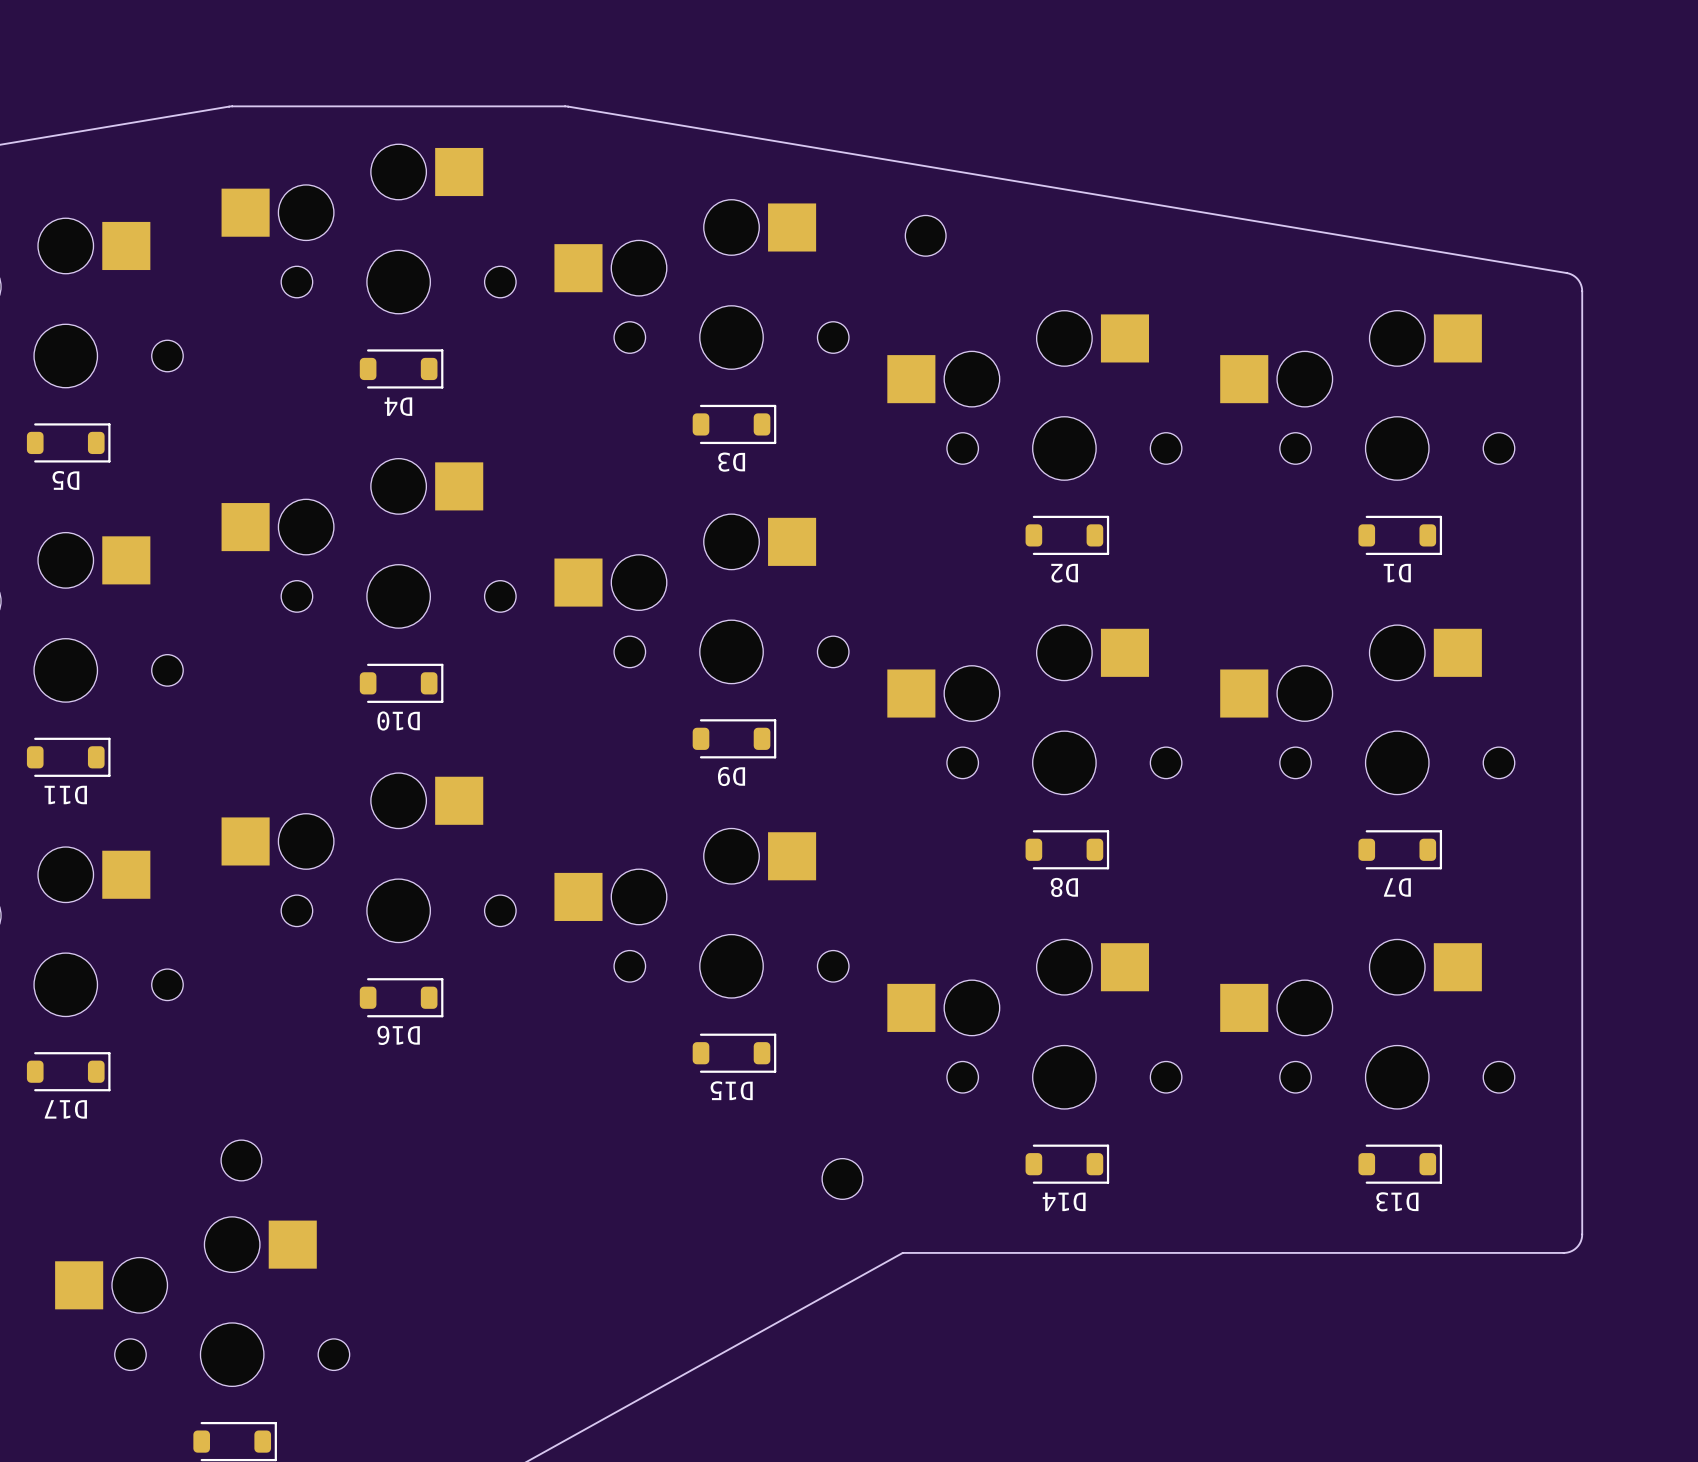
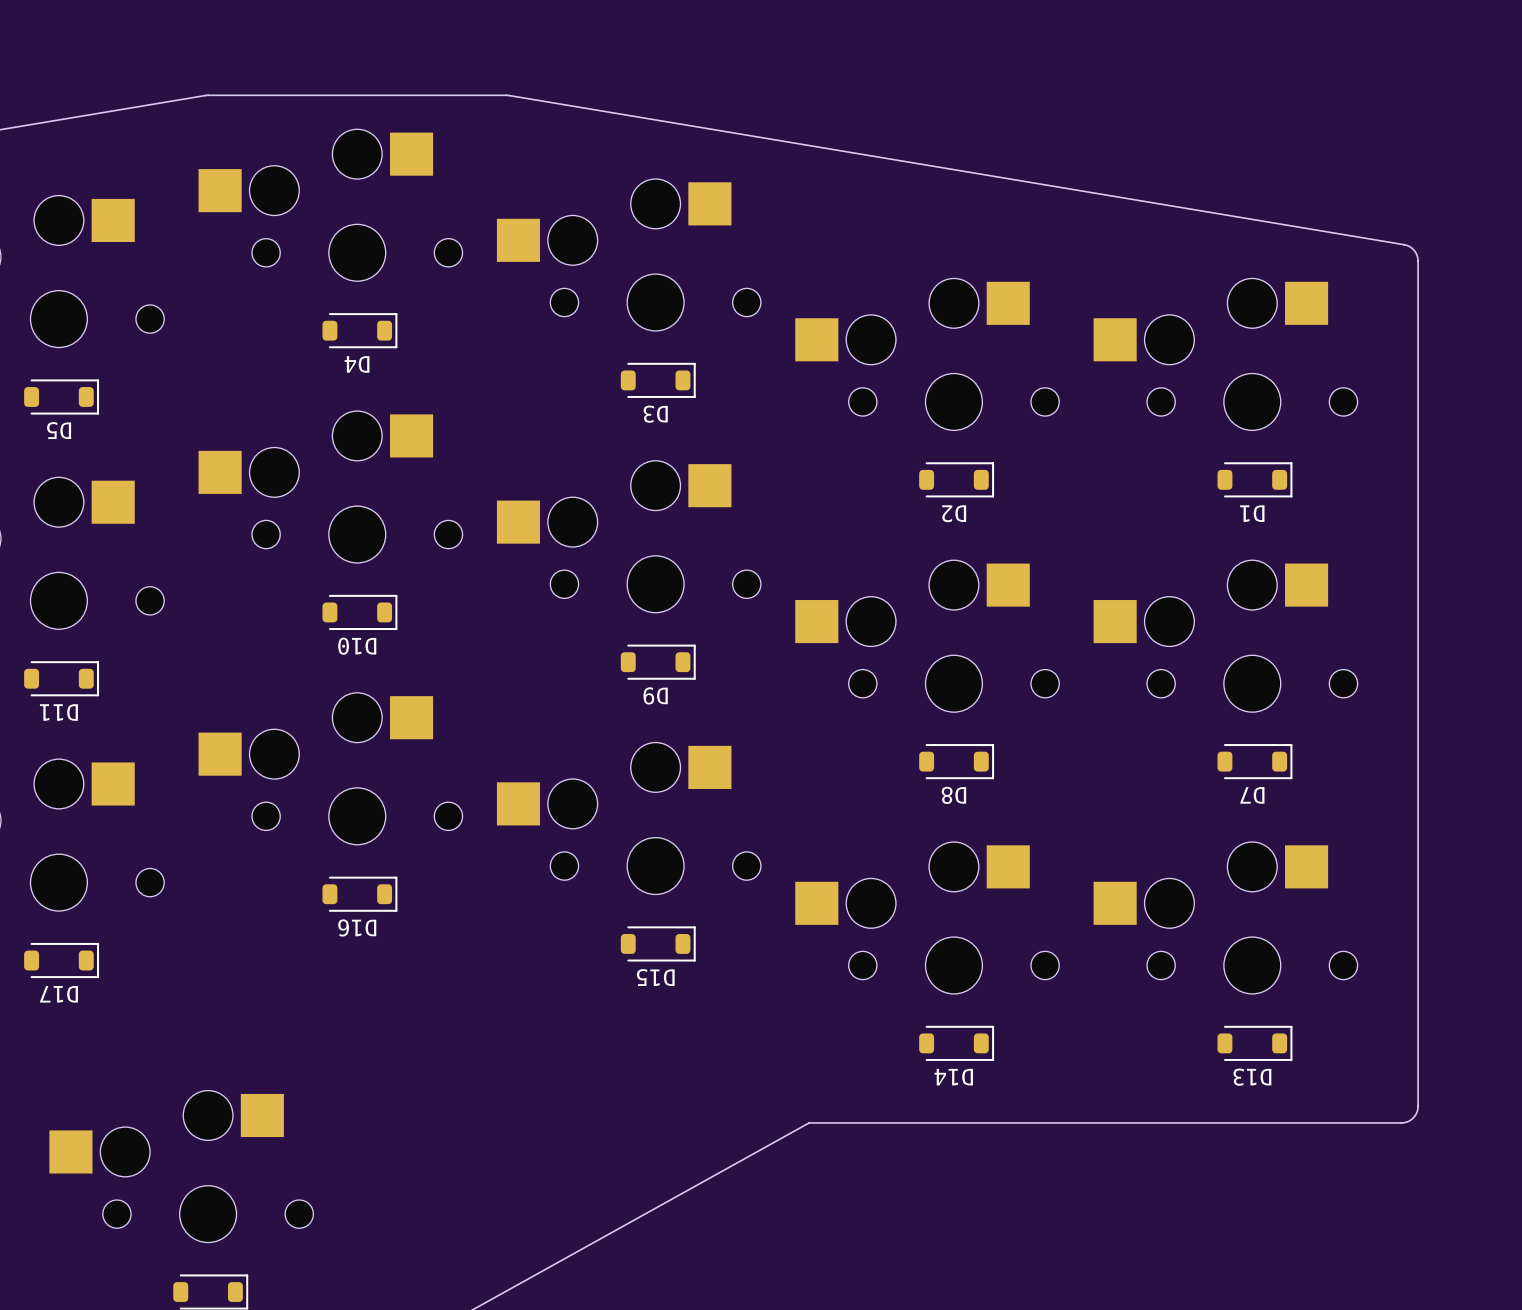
part: (925, 235) -> none
part: (241, 1160) -> none
part: (842, 1178) -> none

